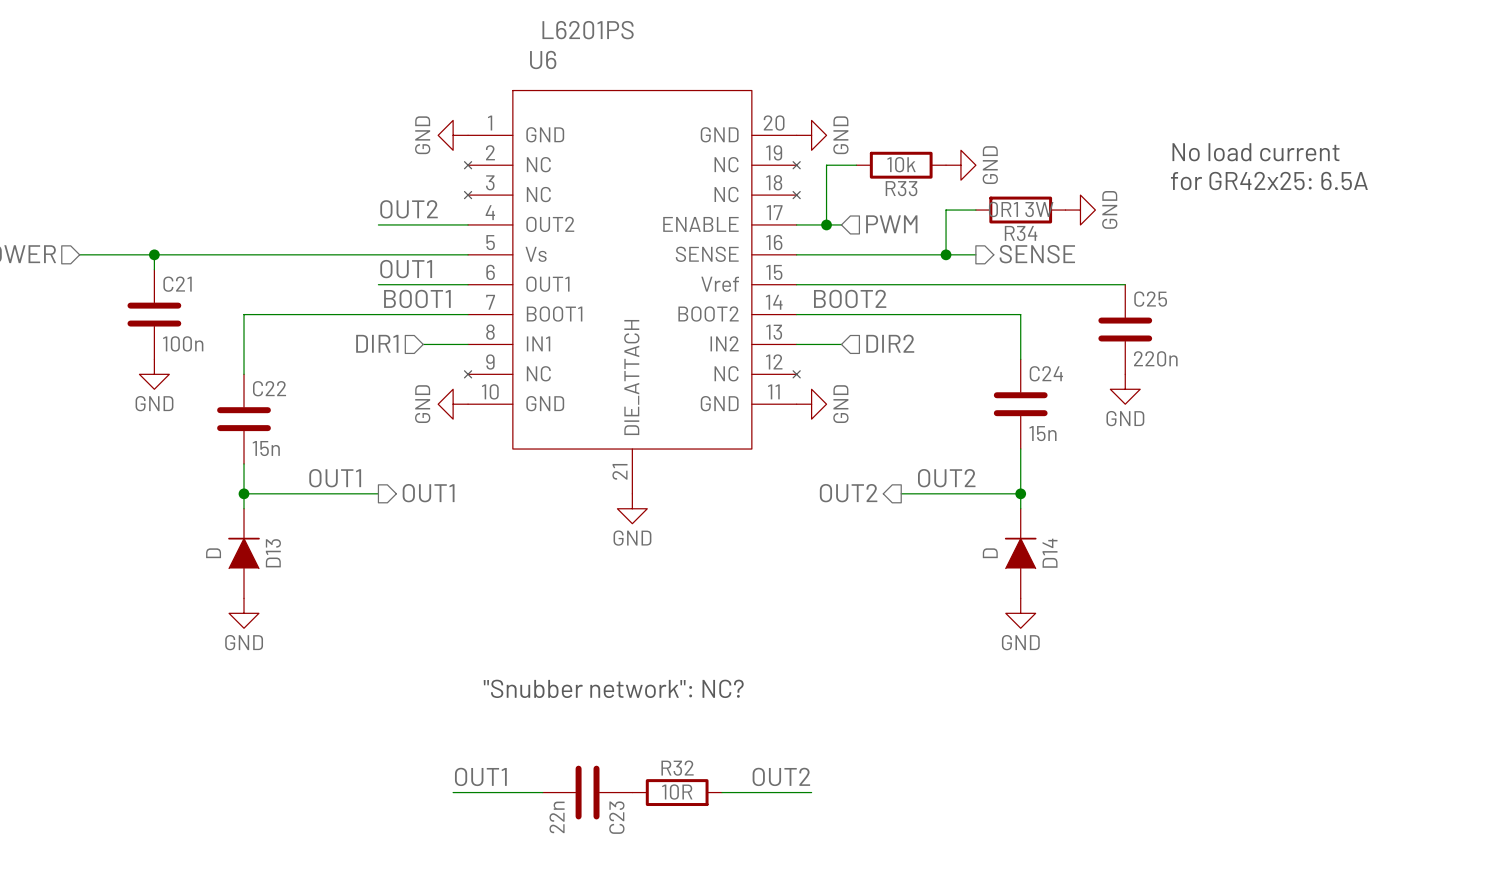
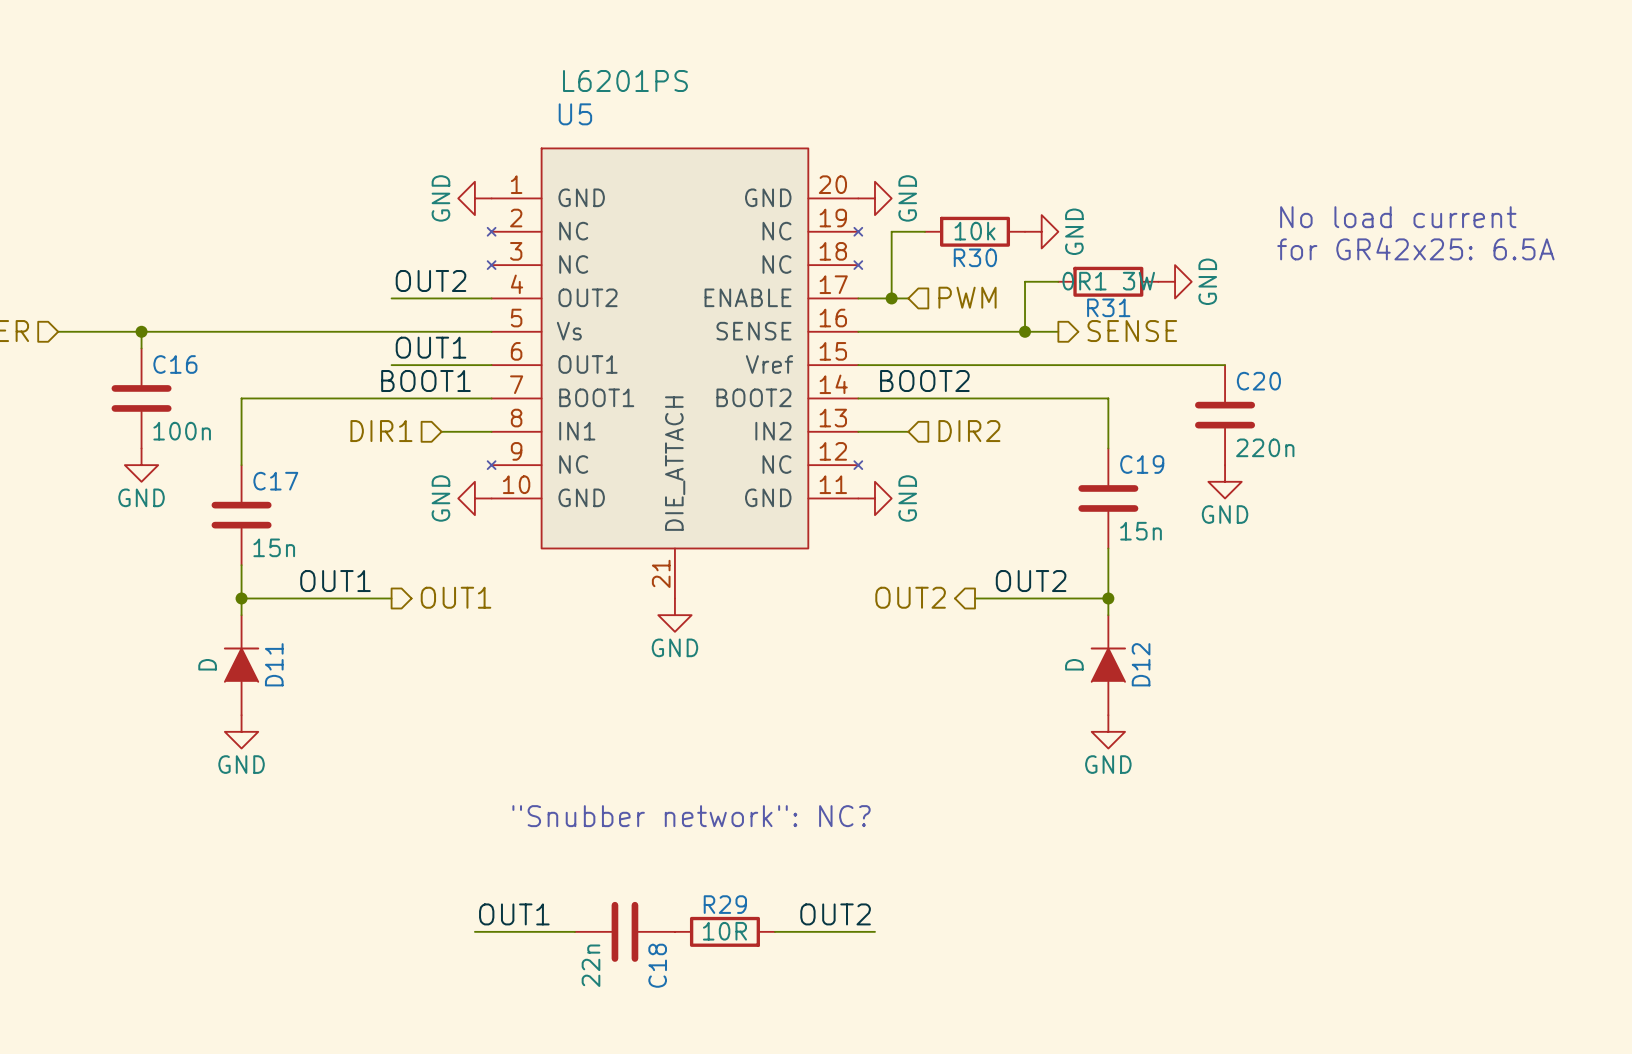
U6 name: U6 (543, 59) -> U5 (575, 114)
R33 name: R33 (901, 188) -> R30 (975, 257)
R34 name: R34 (1021, 233) -> R31 (1108, 307)
C21 name: C21 (177, 284) -> C16 (175, 364)
C25 name: C25 (1150, 299) -> C20 (1258, 381)
C24 name: C24 (1046, 373) -> C19 (1142, 464)
C22 name: C22 (269, 388) -> C17 (275, 481)
D13 name: D13 (273, 553) -> D11 (274, 664)
D14 name: D14 (1050, 553) -> D12 (1141, 664)
R32 name: R32 (677, 768) -> R29 (725, 904)
C23 name: C23 (616, 817) -> C18 (657, 965)

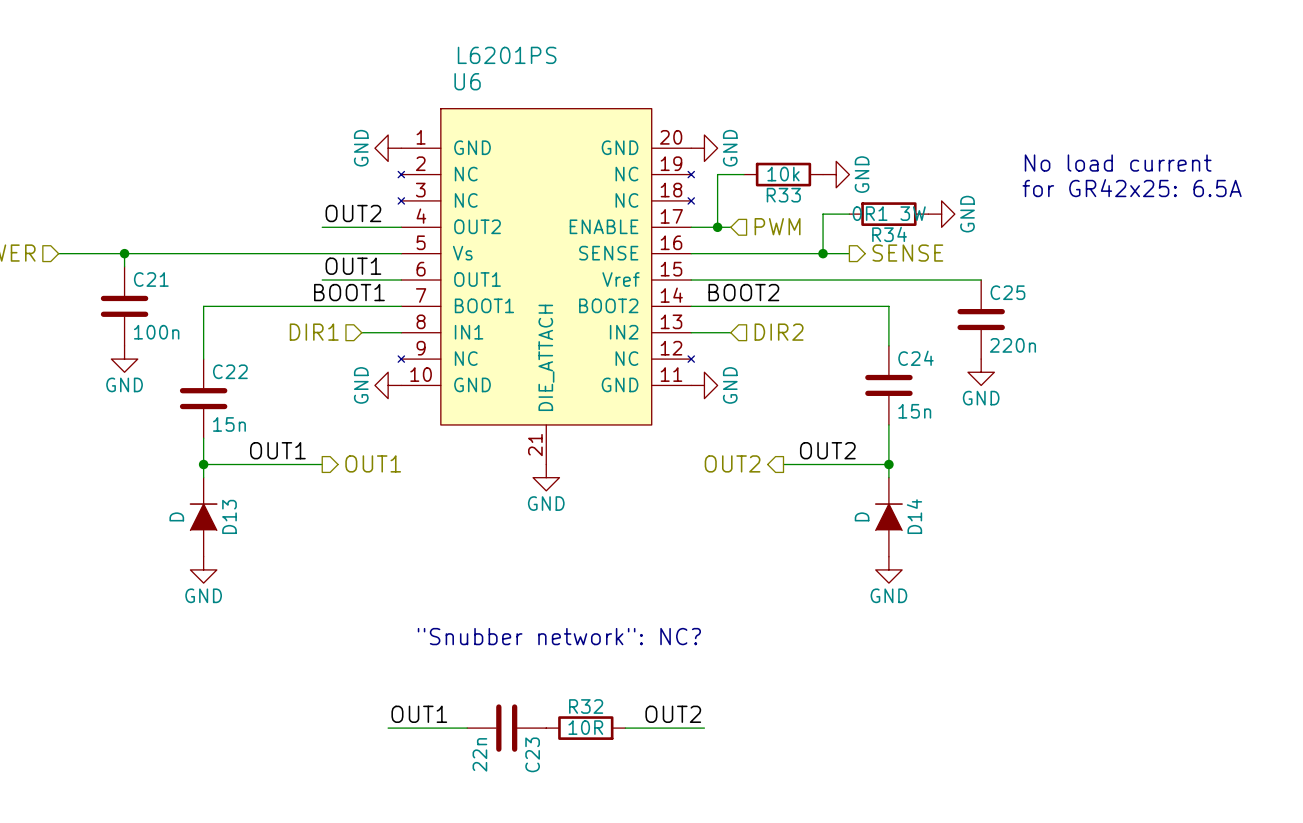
U5 name: U5 (575, 114) -> U6 (467, 81)
R30 name: R30 (975, 257) -> R33 (783, 195)
R31 name: R31 (1108, 307) -> R34 (889, 234)
C16 name: C16 (175, 364) -> C21 (151, 279)
C20 name: C20 (1258, 381) -> C25 (1007, 292)
C19 name: C19 (1142, 464) -> C24 (916, 358)
C17 name: C17 (275, 481) -> C22 (230, 371)
D11 name: D11 (274, 664) -> D13 (229, 516)
D12 name: D12 (1141, 664) -> D14 (914, 516)
R29 name: R29 (725, 904) -> R32 (586, 706)
C18 name: C18 (657, 965) -> C23 (532, 754)

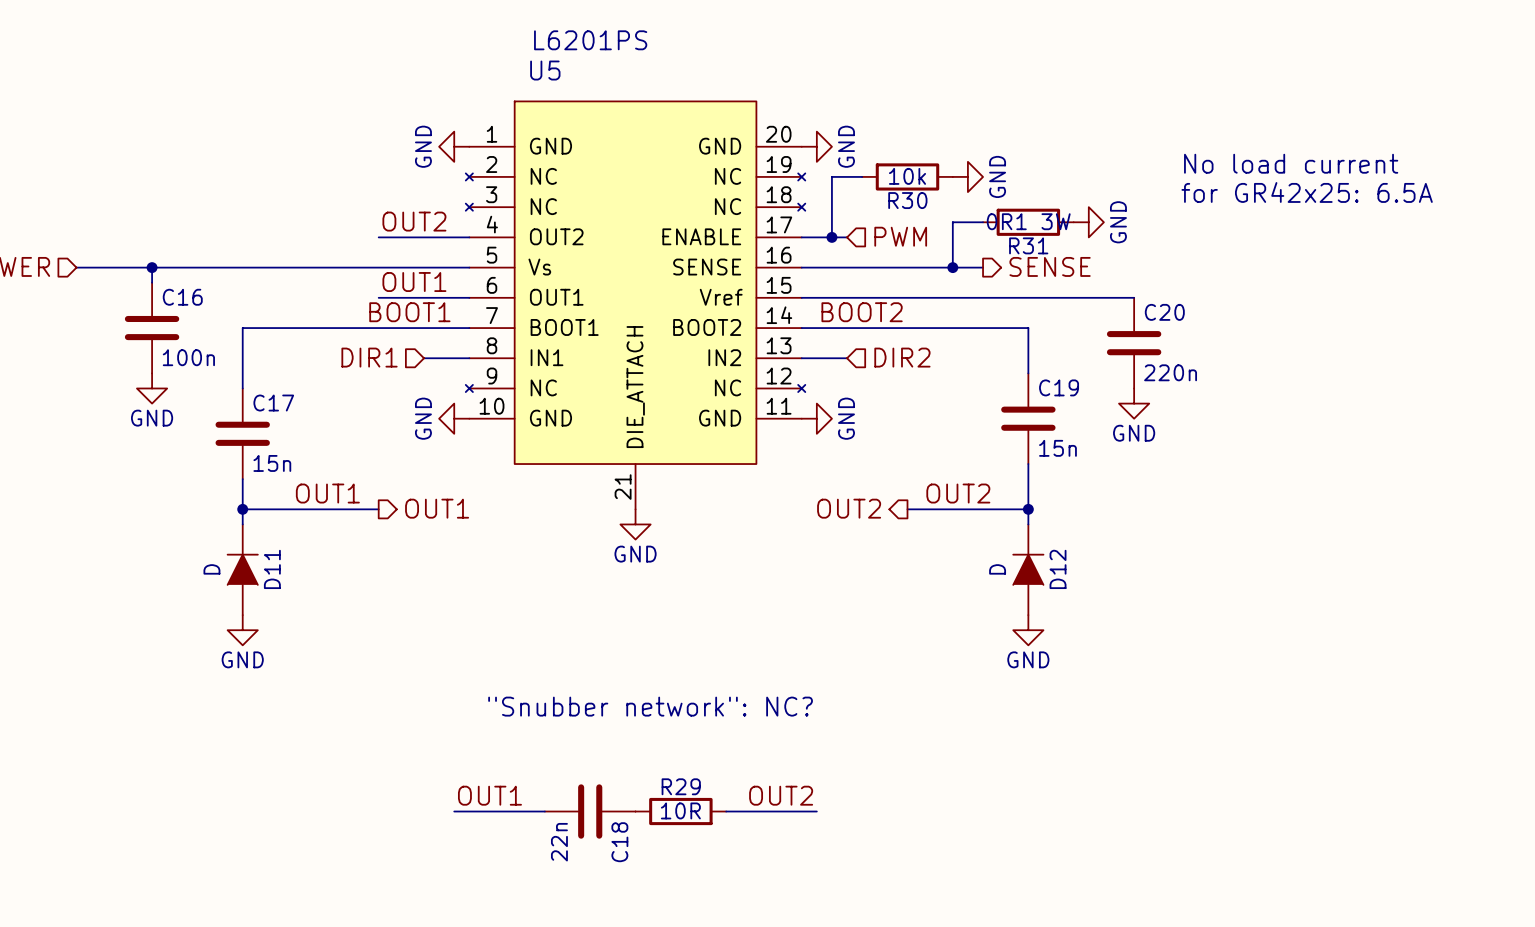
U6 name: U6 (467, 81) -> U5 (545, 70)
R33 name: R33 (783, 195) -> R30 (907, 200)
R34 name: R34 (889, 234) -> R31 (1028, 245)
C21 name: C21 (151, 279) -> C16 (182, 297)
C25 name: C25 (1007, 292) -> C20 (1164, 312)
C24 name: C24 (916, 358) -> C19 (1059, 387)
C22 name: C22 (230, 371) -> C17 (273, 403)
D13 name: D13 (229, 516) -> D11 (272, 569)
D14 name: D14 (914, 516) -> D12 (1058, 569)
R32 name: R32 (586, 706) -> R29 (681, 786)
C23 name: C23 (532, 754) -> C18 (619, 842)

